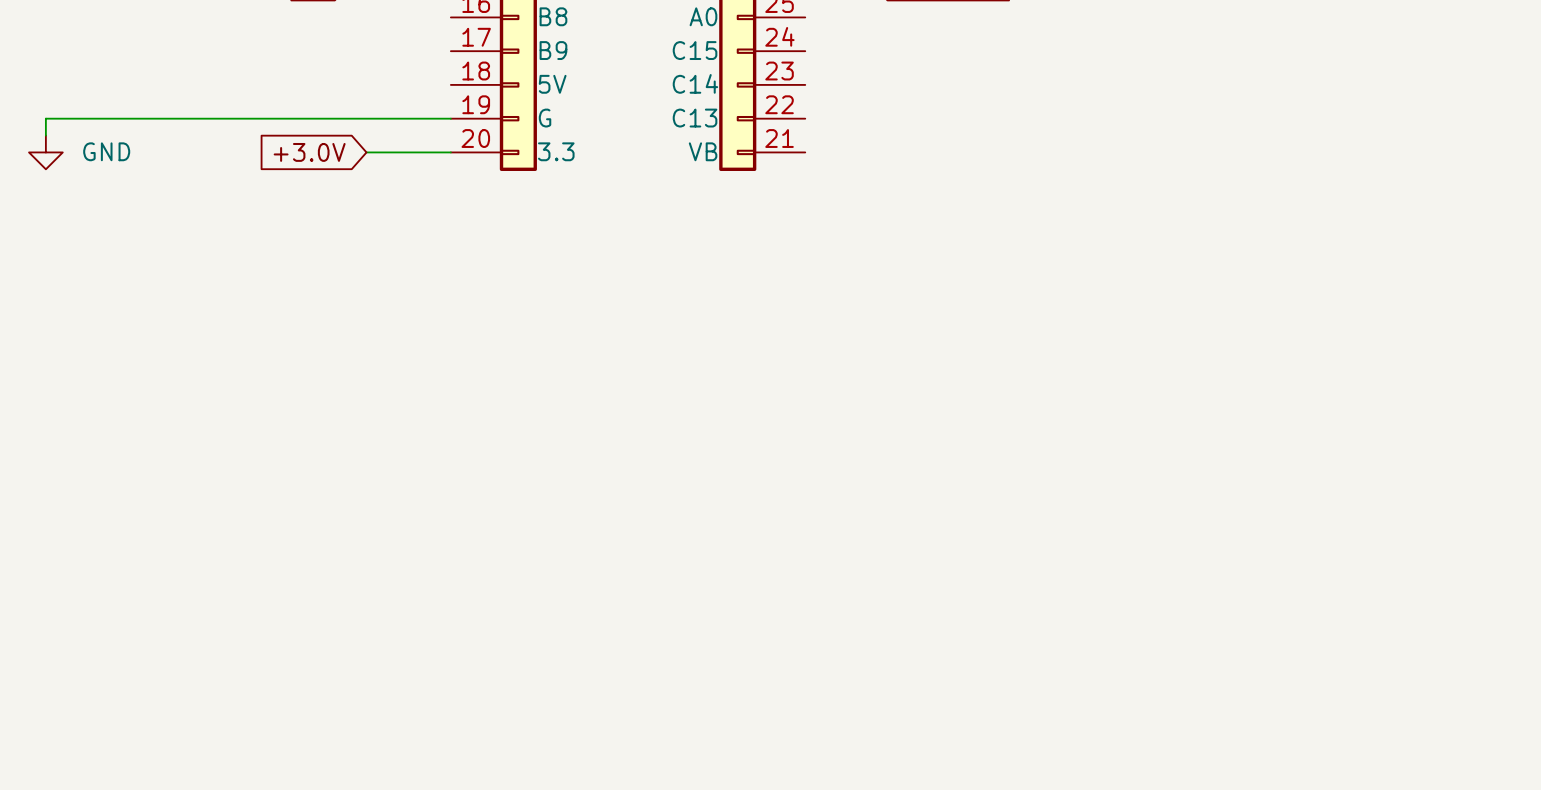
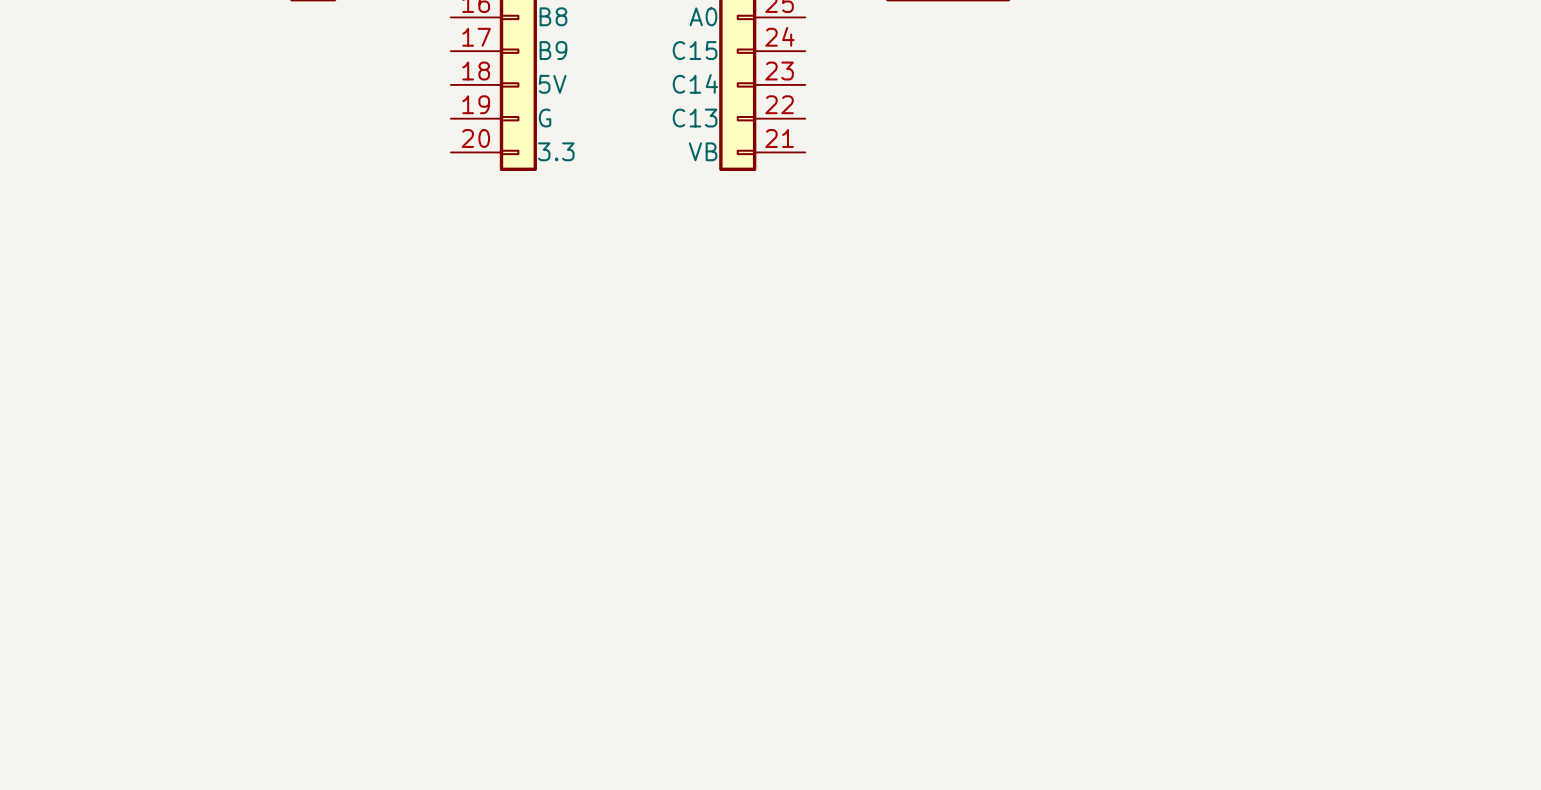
wire: (450, 118) (45, 118) (45, 135) -> none
power symbol: GND (45, 152) -> none
global label: +3.0V (309, 152) -> none
wire: (366, 152) (450, 152) -> none

